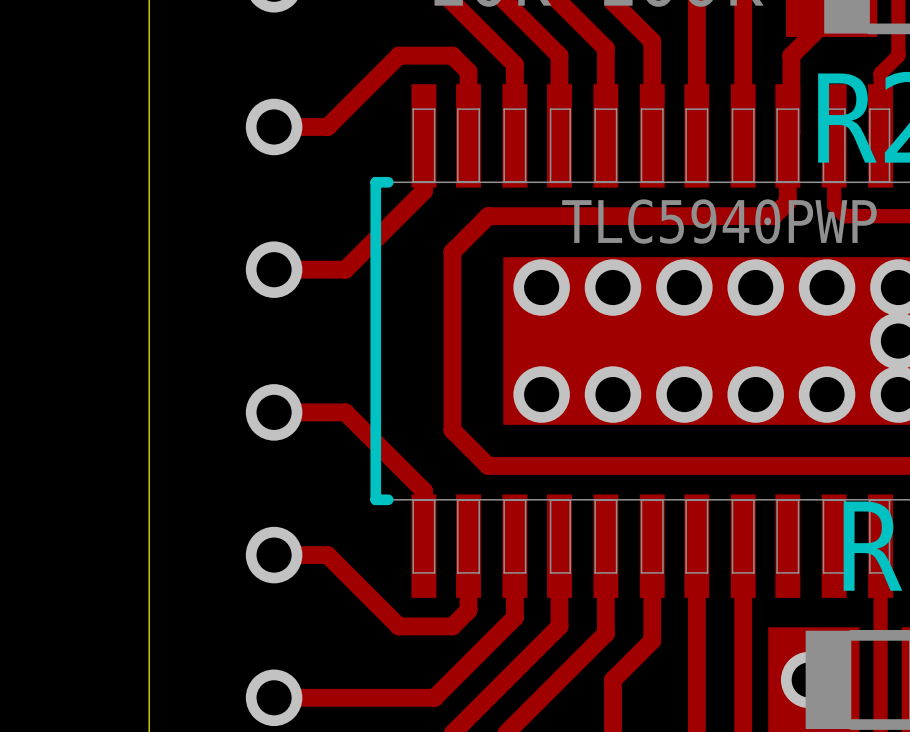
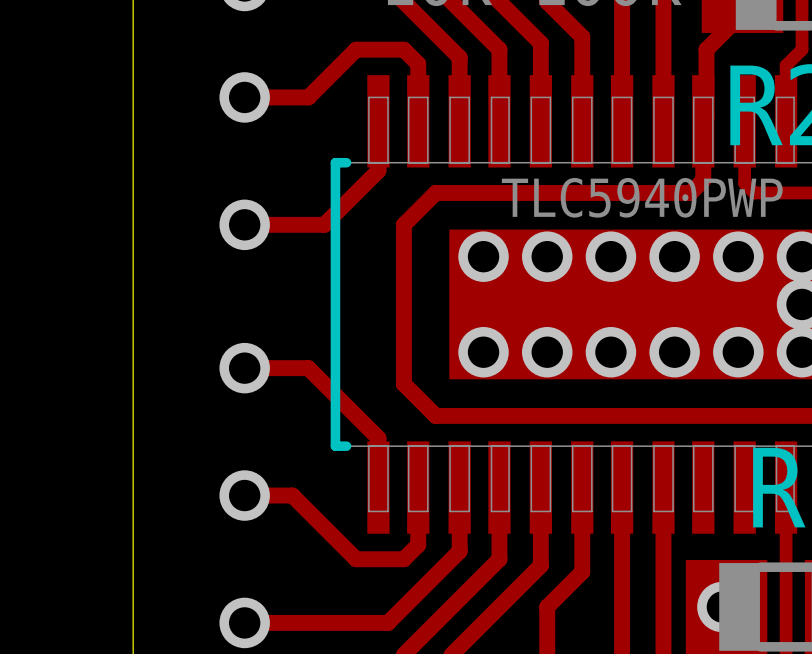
track: (345, 109) (327, 126) (274, 126) -> (308, 97) (244, 97)
via position: (274, 126) -> (244, 97)
track: (363, 251) (345, 269) (274, 269) -> (324, 224) (244, 224)
via position: (274, 269) -> (244, 224)

